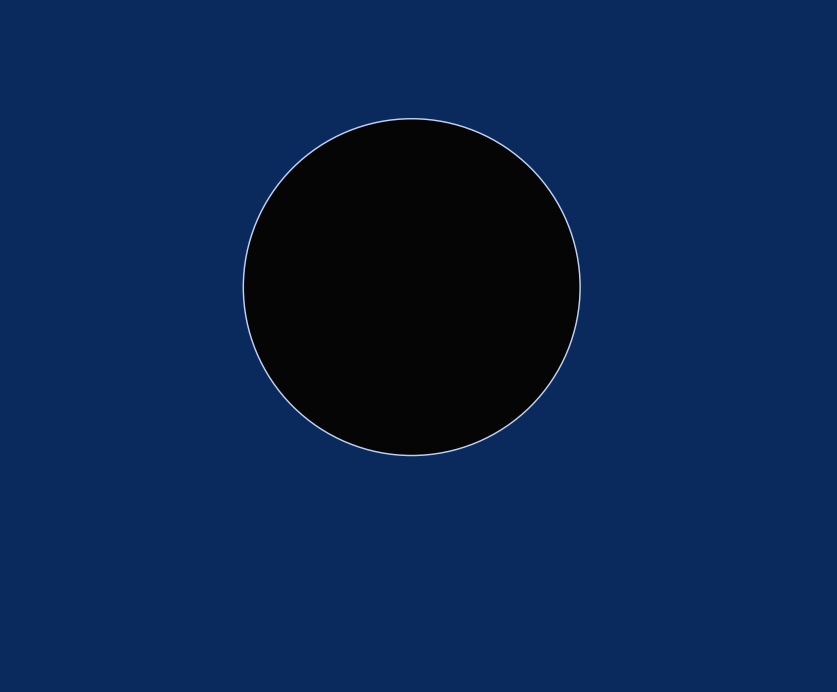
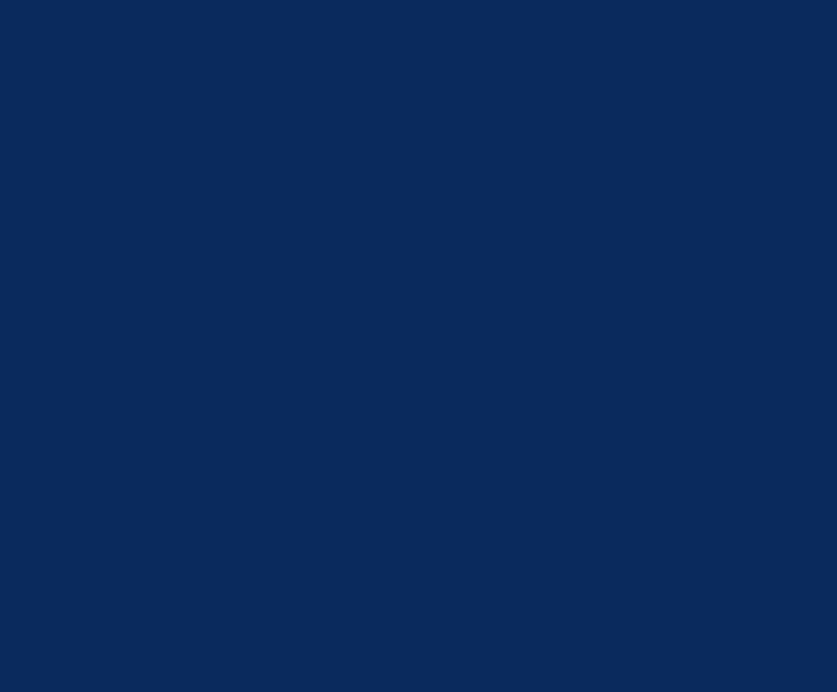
part: (411, 287) -> none

